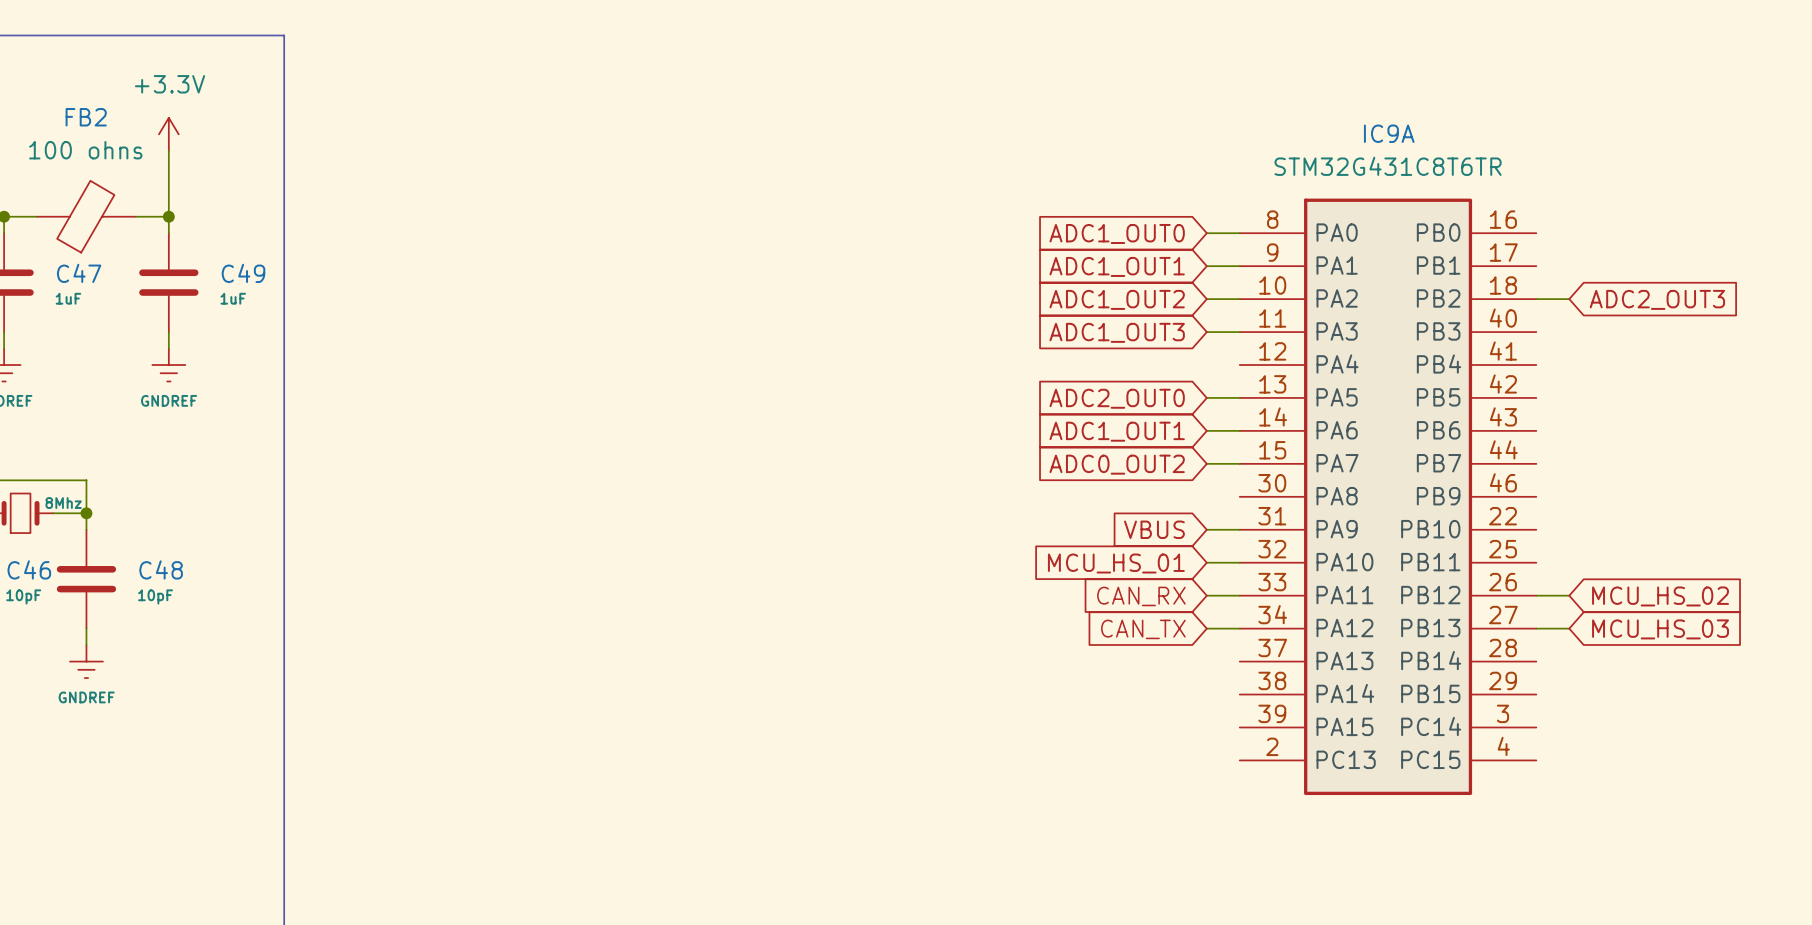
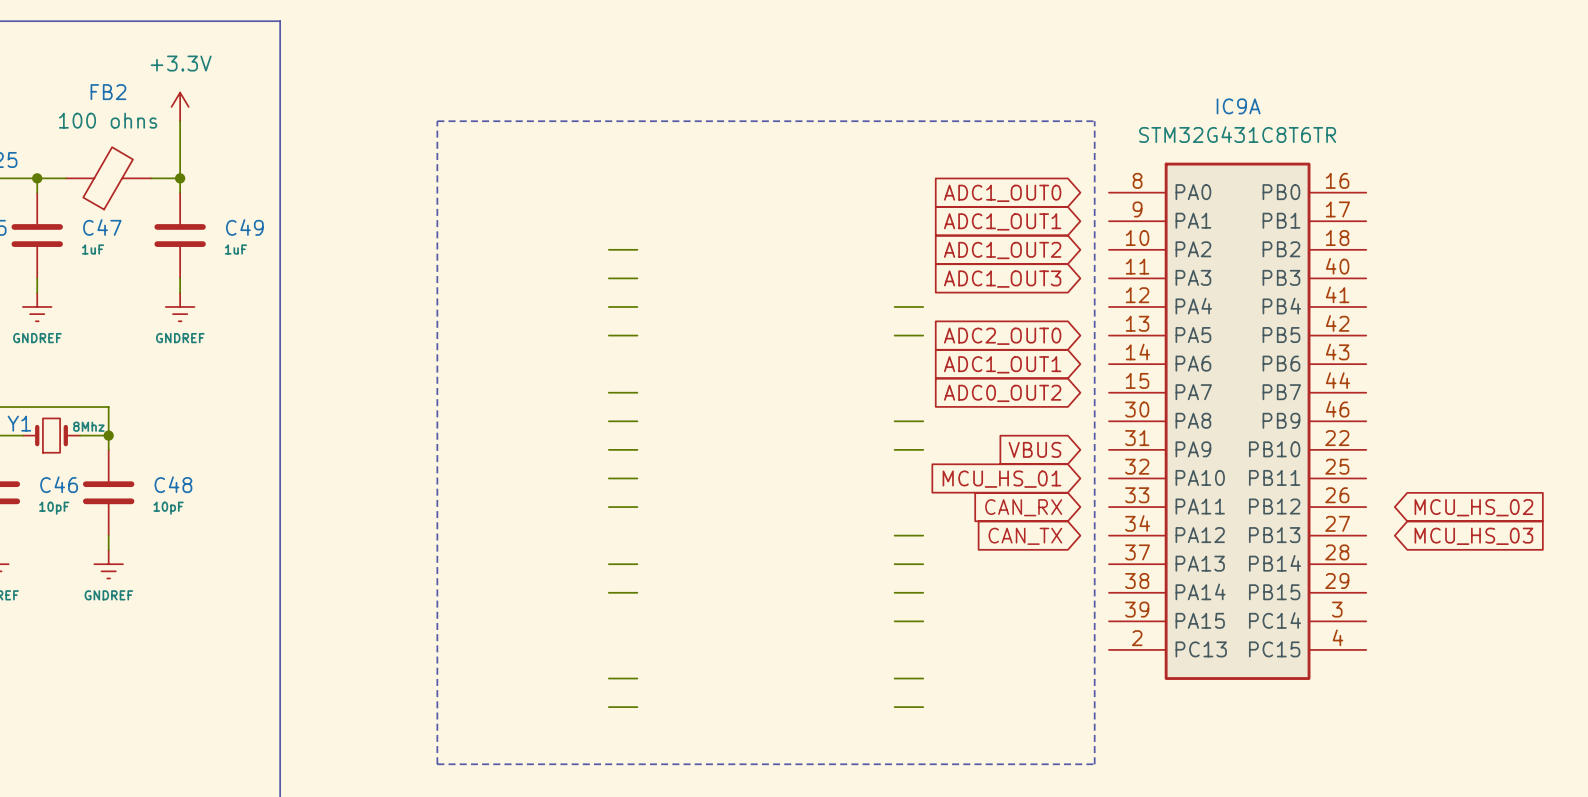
line: none -> (437, 121) (437, 764) (1094, 764) (1094, 121) (437, 121)
wire: (1206, 233) (1239, 233) -> none
wire: (1206, 266) (1239, 266) -> (894, 306) (923, 306)
wire: none -> (608, 249) (637, 249)
wire: (1206, 299) (1239, 299) -> (894, 335) (923, 335)
wire: (1536, 299) (1569, 299) -> none
global label: ADC2_OUT3 (1657, 299) -> none
wire: none -> (608, 278) (637, 278)
wire: (1206, 332) (1239, 332) -> none
wire: none -> (608, 306) (637, 306)
wire: none -> (608, 335) (637, 335)
wire: (1206, 397) (1239, 397) -> (894, 421) (923, 421)
wire: (1206, 430) (1239, 430) -> (894, 449) (923, 449)
wire: none -> (608, 392) (637, 392)
wire: (1206, 463) (1239, 463) -> none
wire: none -> (608, 421) (637, 421)
wire: none -> (608, 449) (637, 449)
wire: (1206, 529) (1239, 529) -> (894, 535) (923, 535)
wire: none -> (608, 478) (637, 478)
wire: (1206, 562) (1239, 562) -> (894, 564) (923, 564)
wire: none -> (608, 507) (637, 507)
wire: (1206, 595) (1239, 595) -> (894, 592) (923, 592)
wire: (1536, 595) (1569, 595) -> none
wire: (1206, 628) (1239, 628) -> (894, 621) (923, 621)
wire: (1536, 628) (1569, 628) -> none
wire: none -> (608, 564) (637, 564)
wire: none -> (608, 592) (637, 592)
wire: none -> (608, 678) (637, 678)
wire: none -> (894, 678) (923, 678)
wire: none -> (608, 707) (637, 707)
wire: none -> (894, 707) (923, 707)

